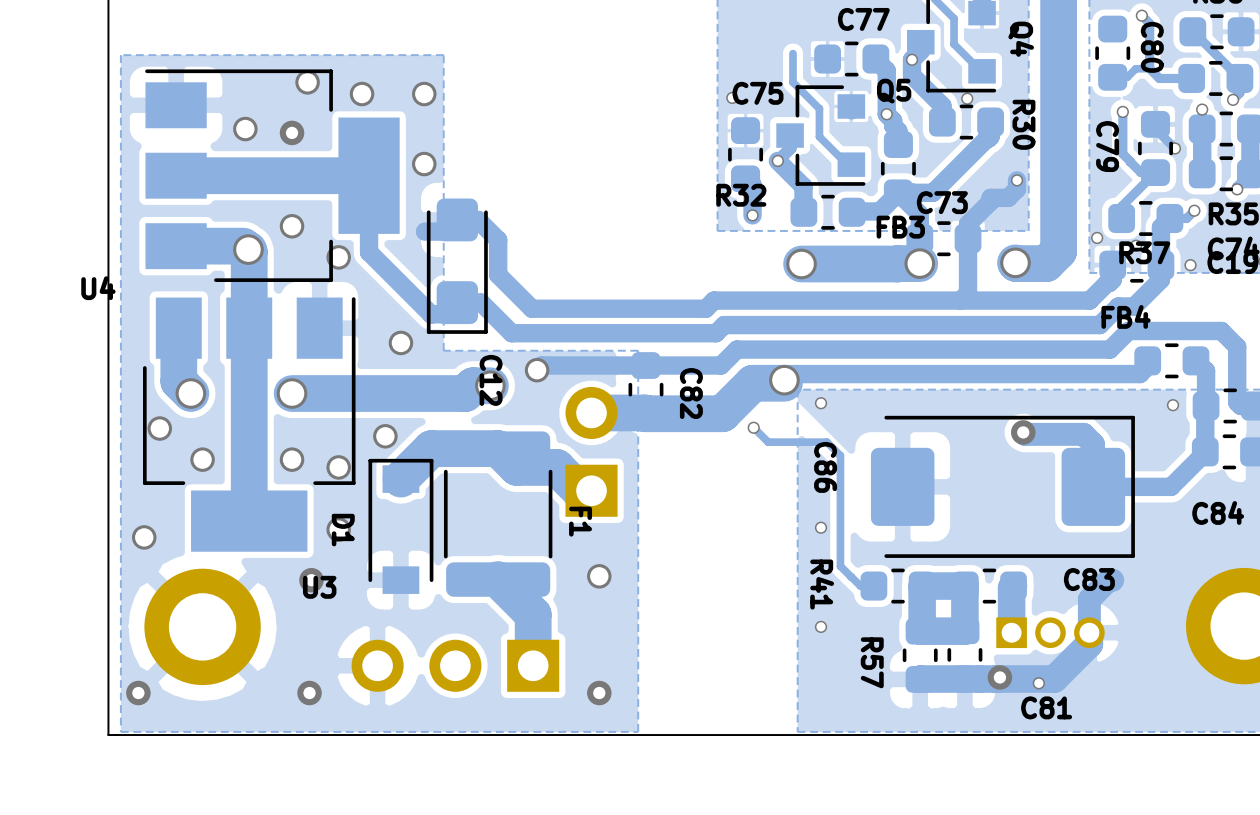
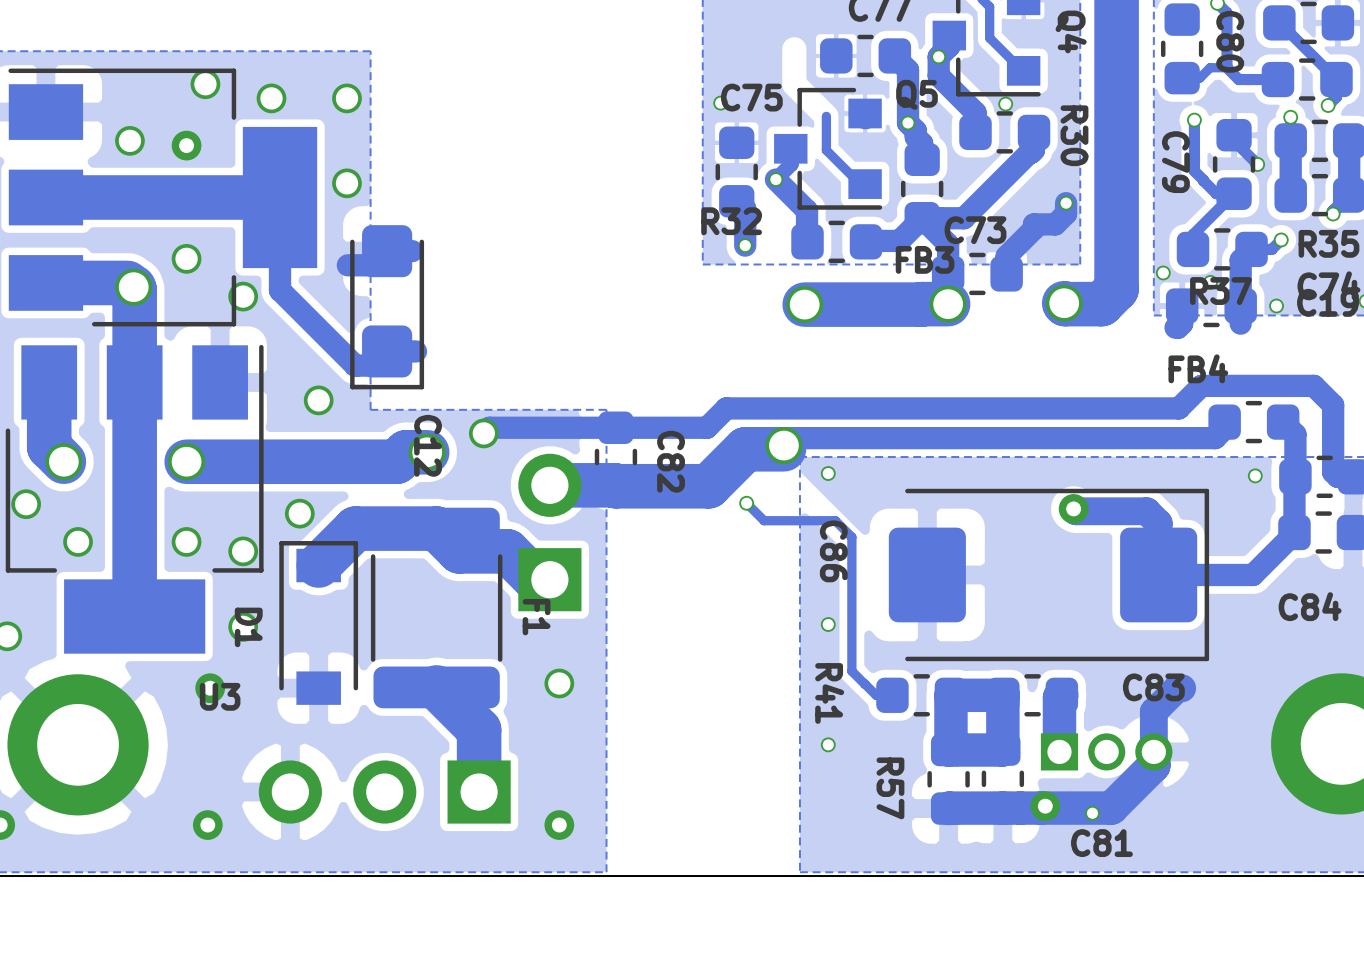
track: (793, 53) (793, 82) (819, 108) -> none
track: (478, 219) (498, 240) (498, 274) (532, 308) (705, 308) (714, 300) (1089, 300) (1107, 283) -> none
track: (968, 238) (968, 293) (960, 300) -> none
track: (1160, 279) (1134, 306) (1118, 306) (1099, 325) (724, 325) (715, 333) (511, 333) (481, 302) -> none

